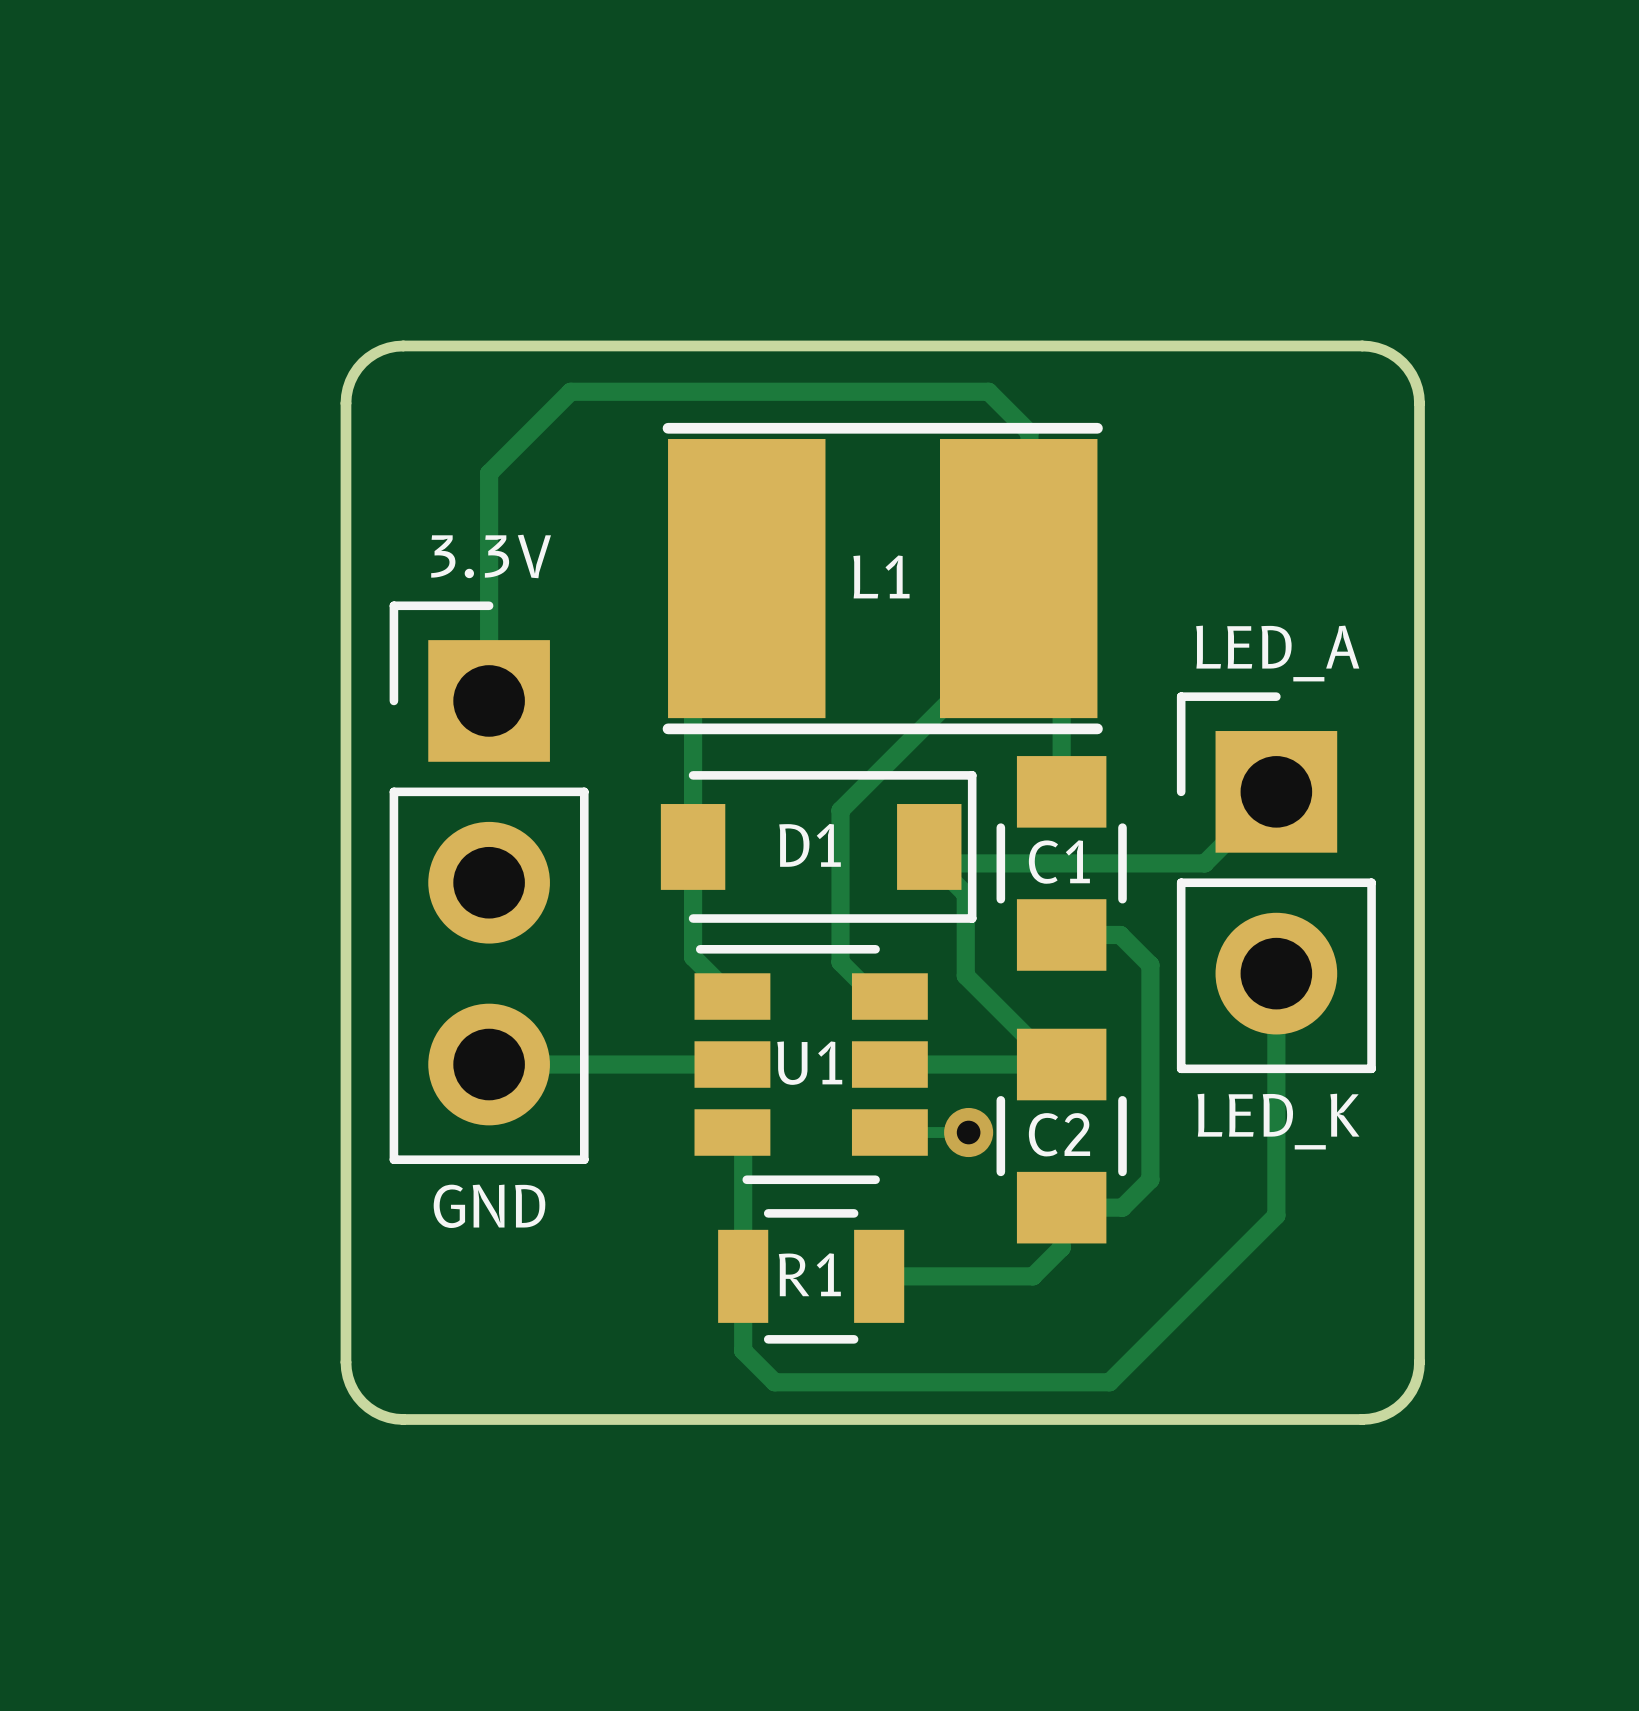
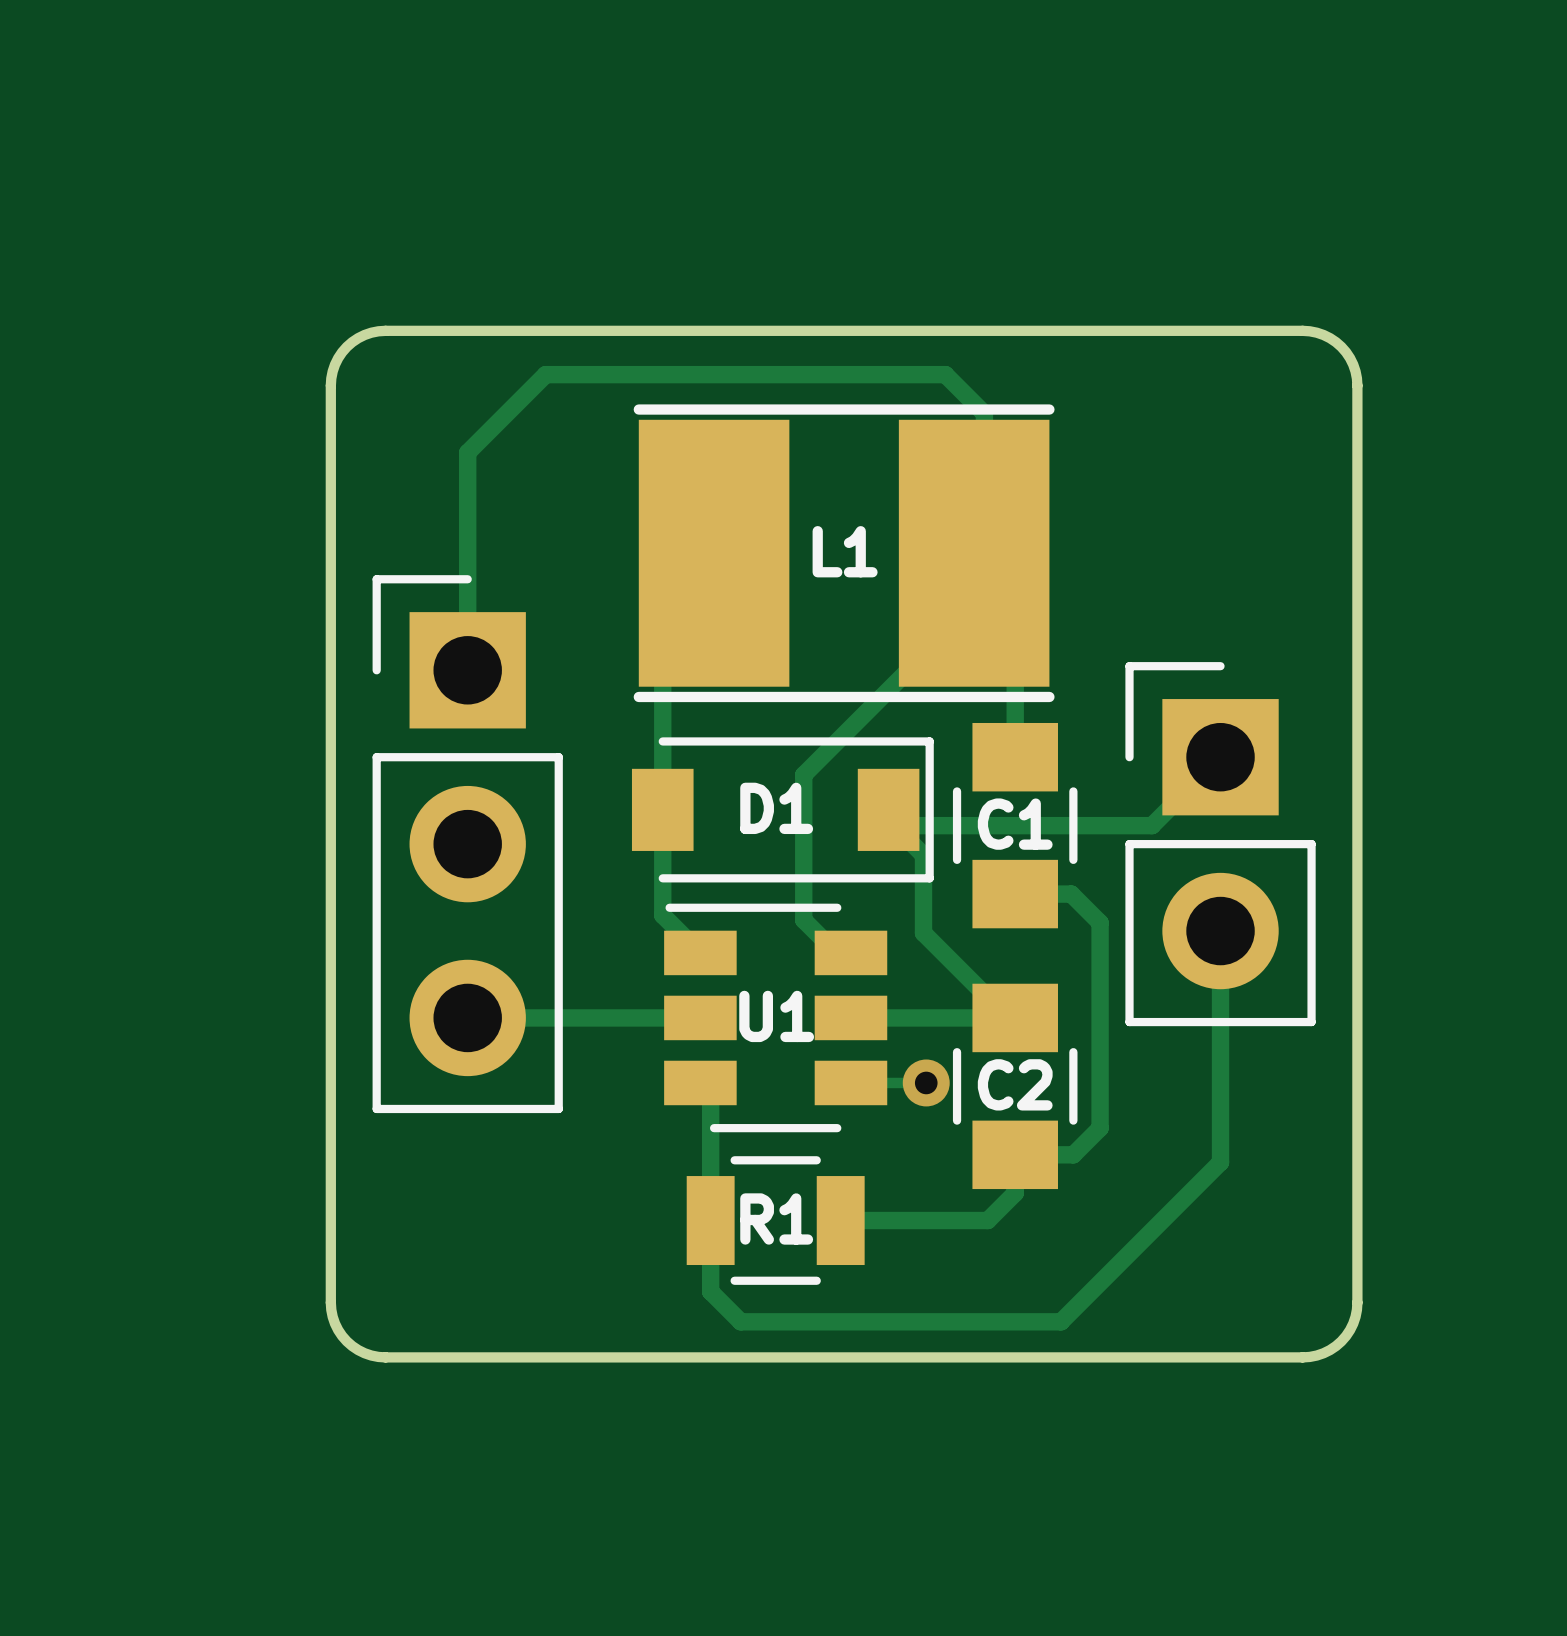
text: 3.3V (491, 556) -> none
text: LED_A (1277, 653) -> none
text: LED_K (1278, 1121) -> none
text: GND (489, 1206) -> none

